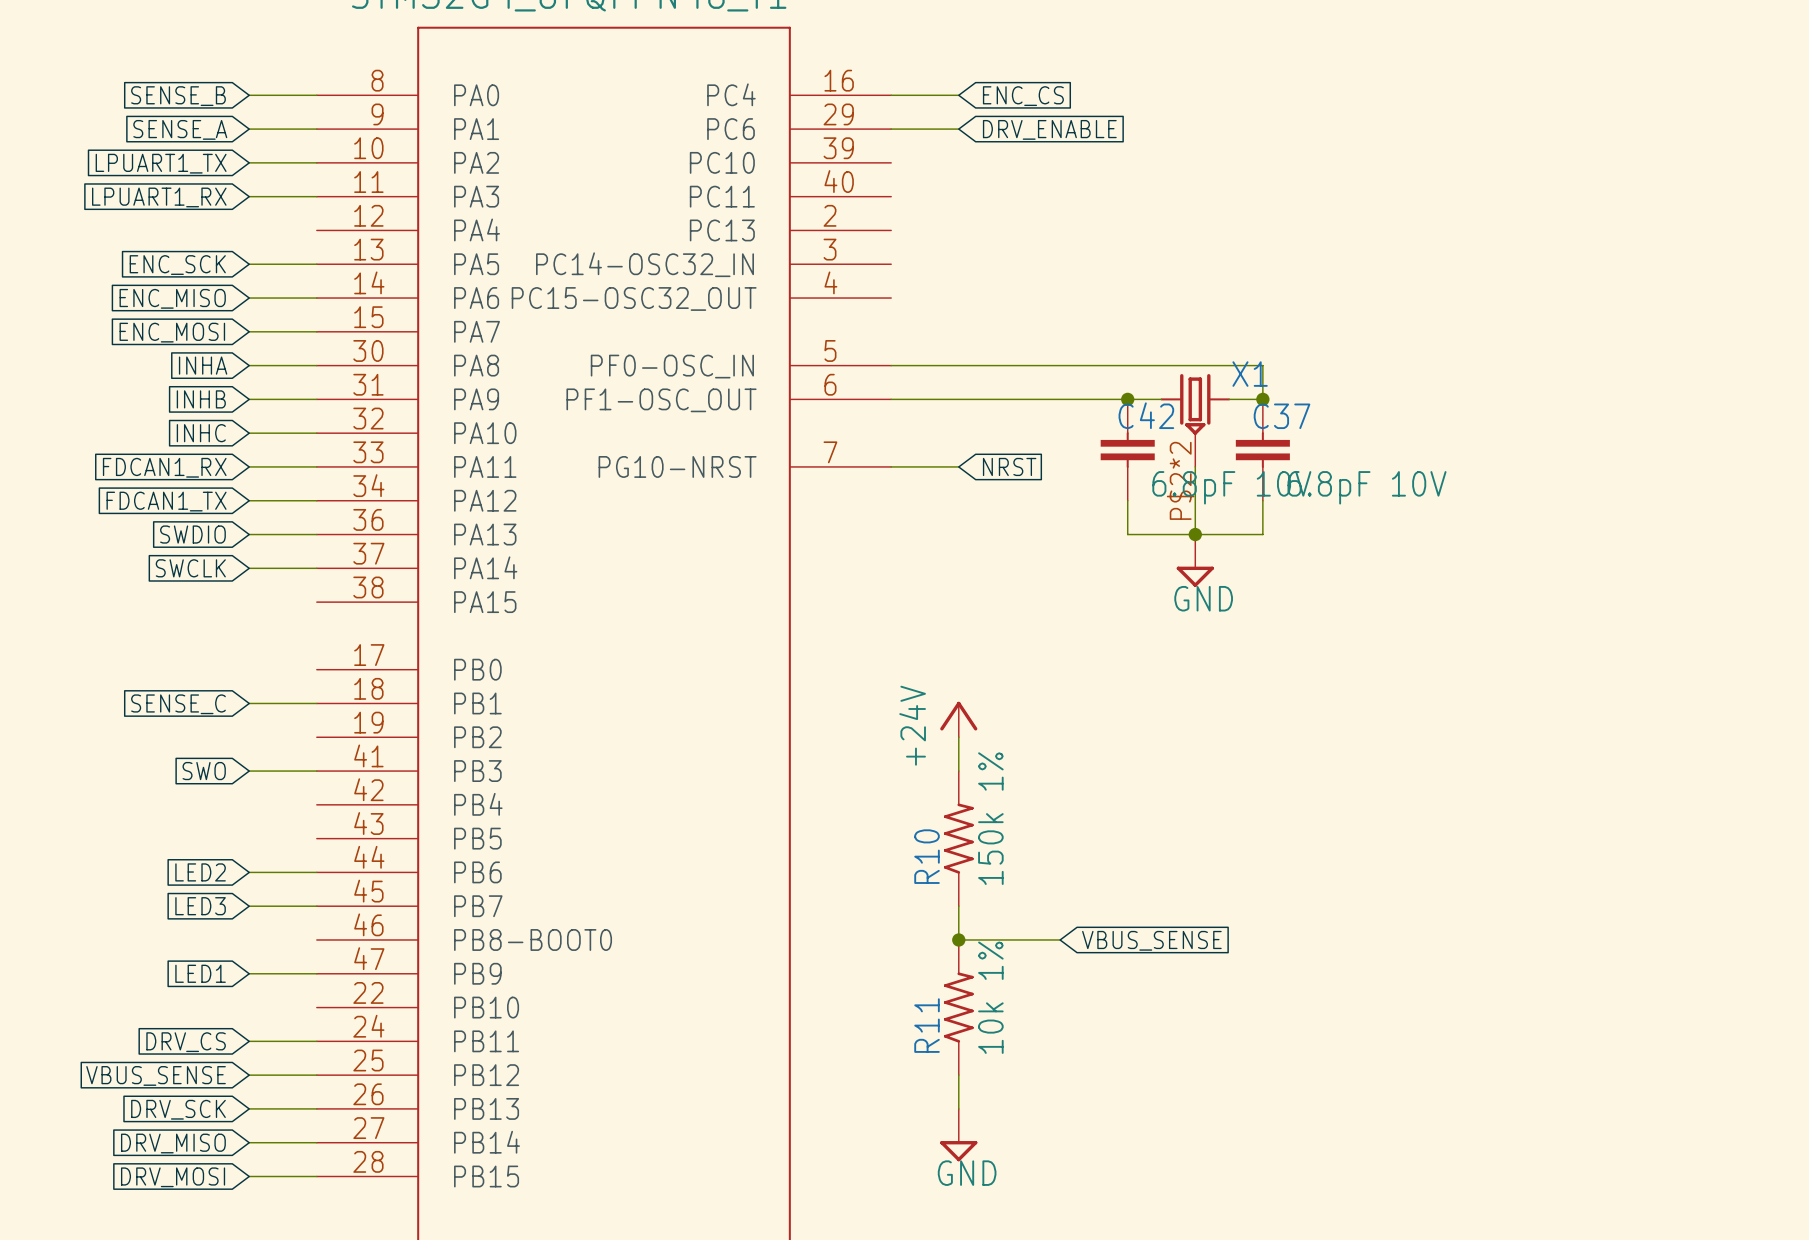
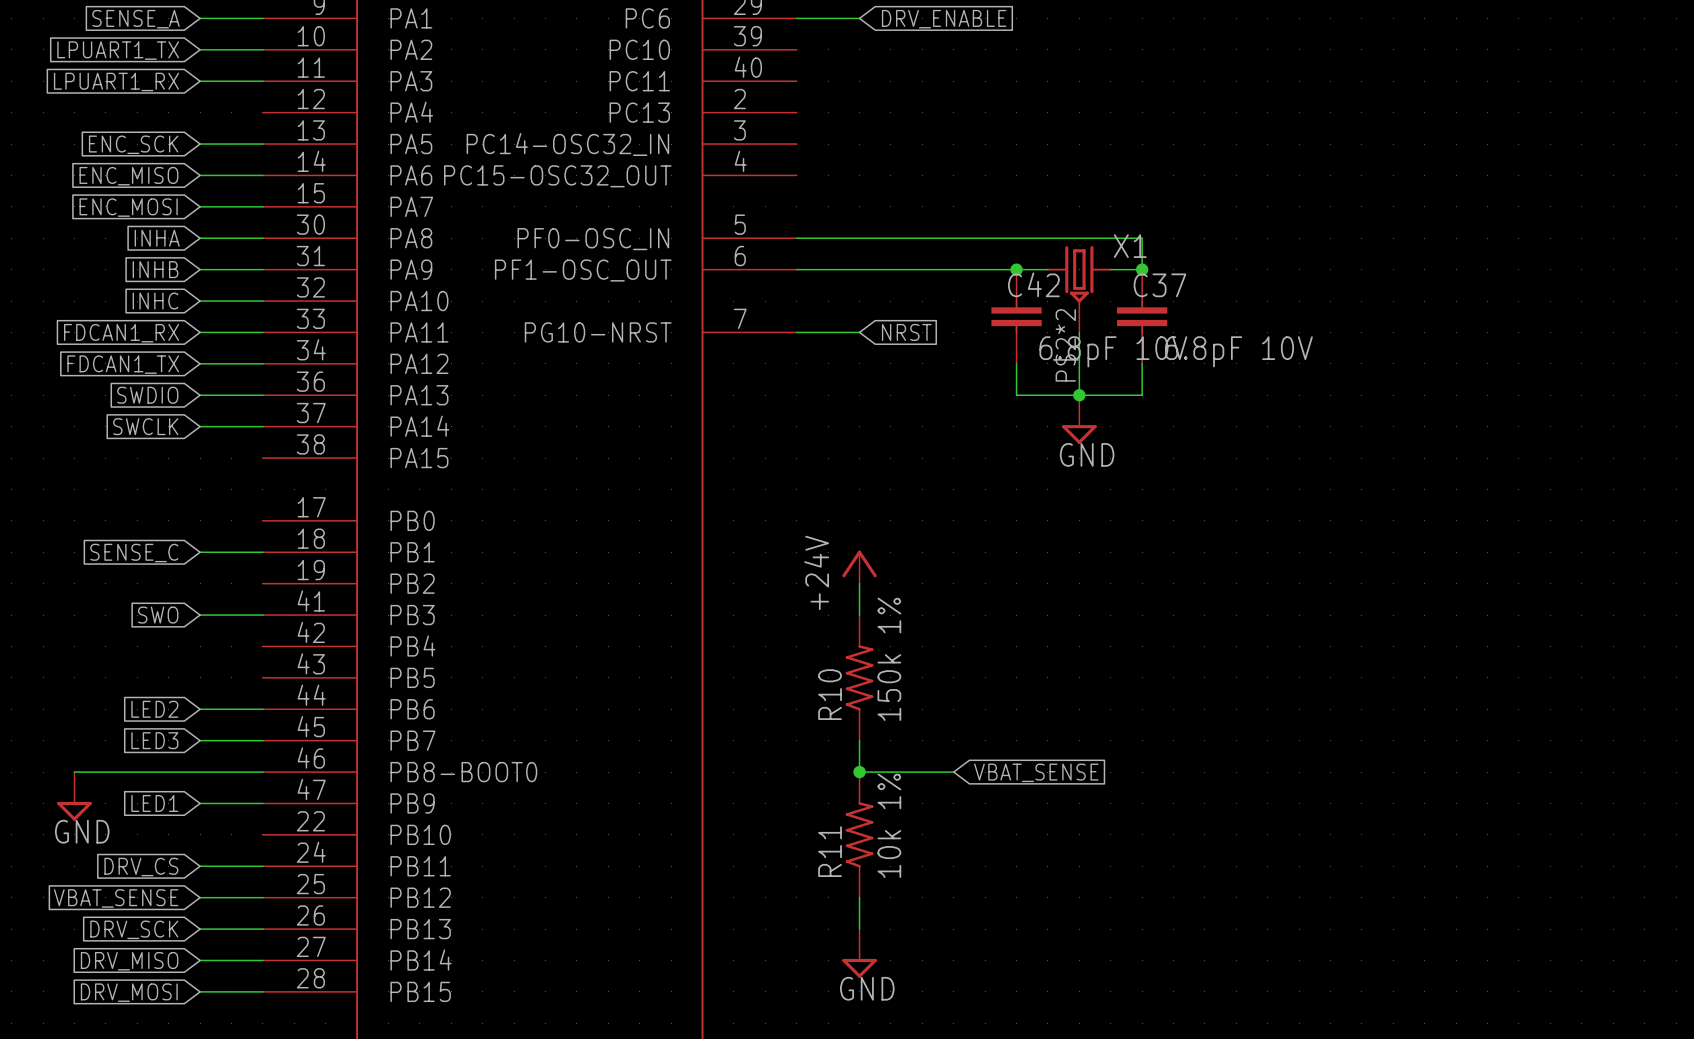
wire: none -> (74, 772) (262, 772)
global label: VBUS_SENSE (1151, 940) -> VBAT_SENSE (1036, 772)
power symbol: none -> GND (74, 796)
global label: VBUS_SENSE (156, 1075) -> VBAT_SENSE (116, 898)

